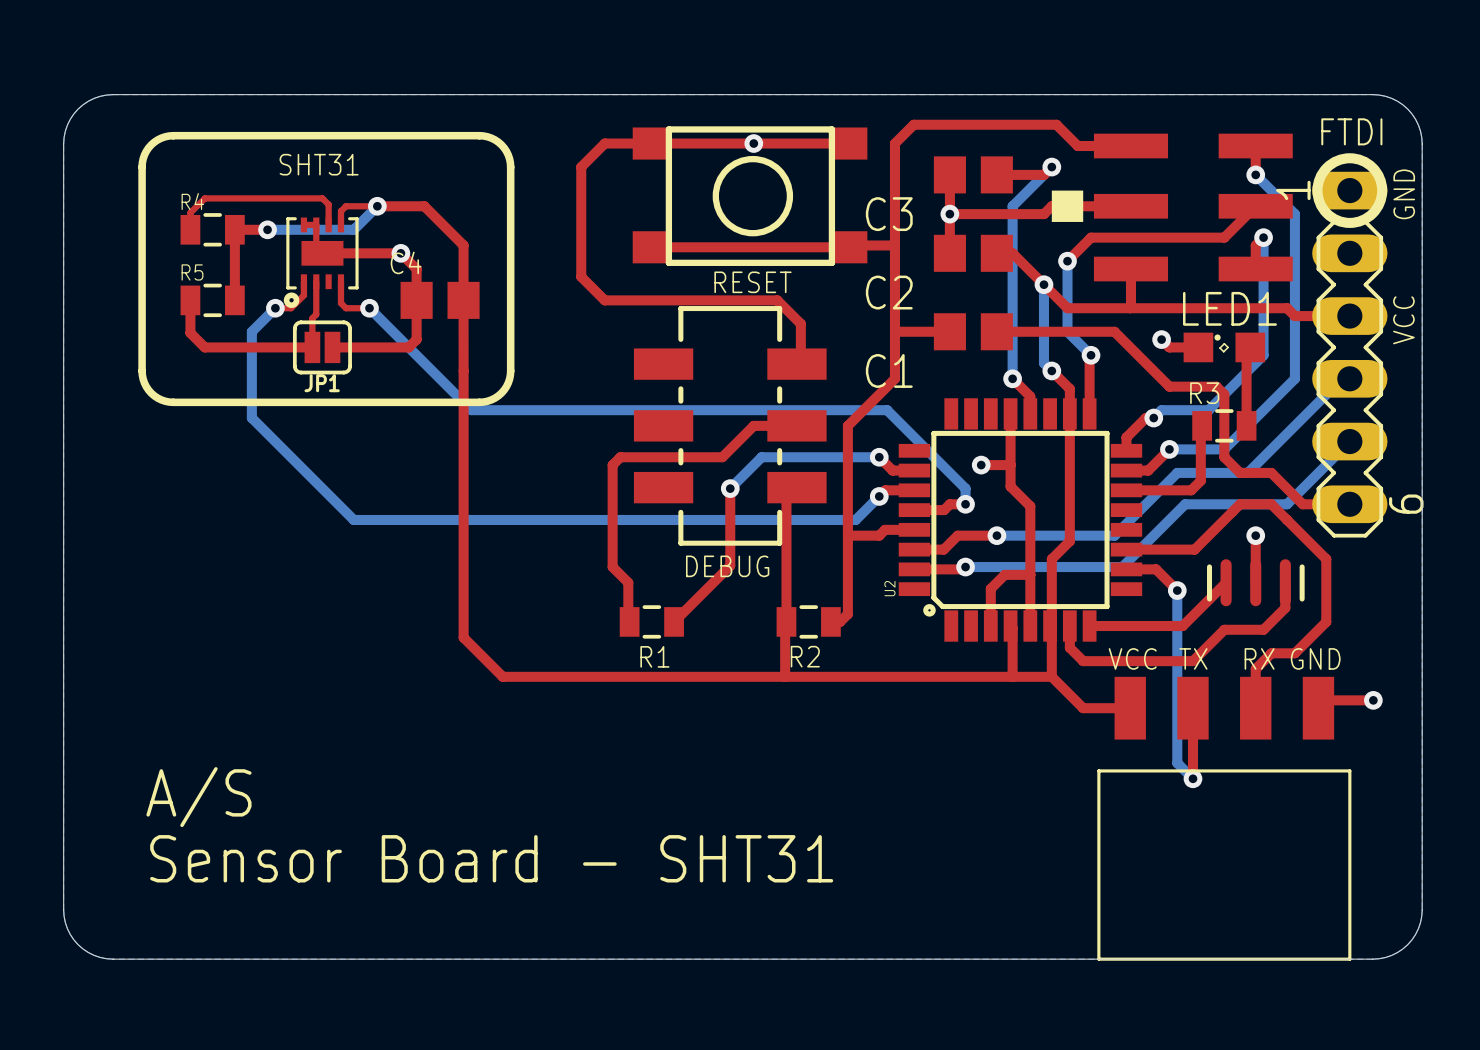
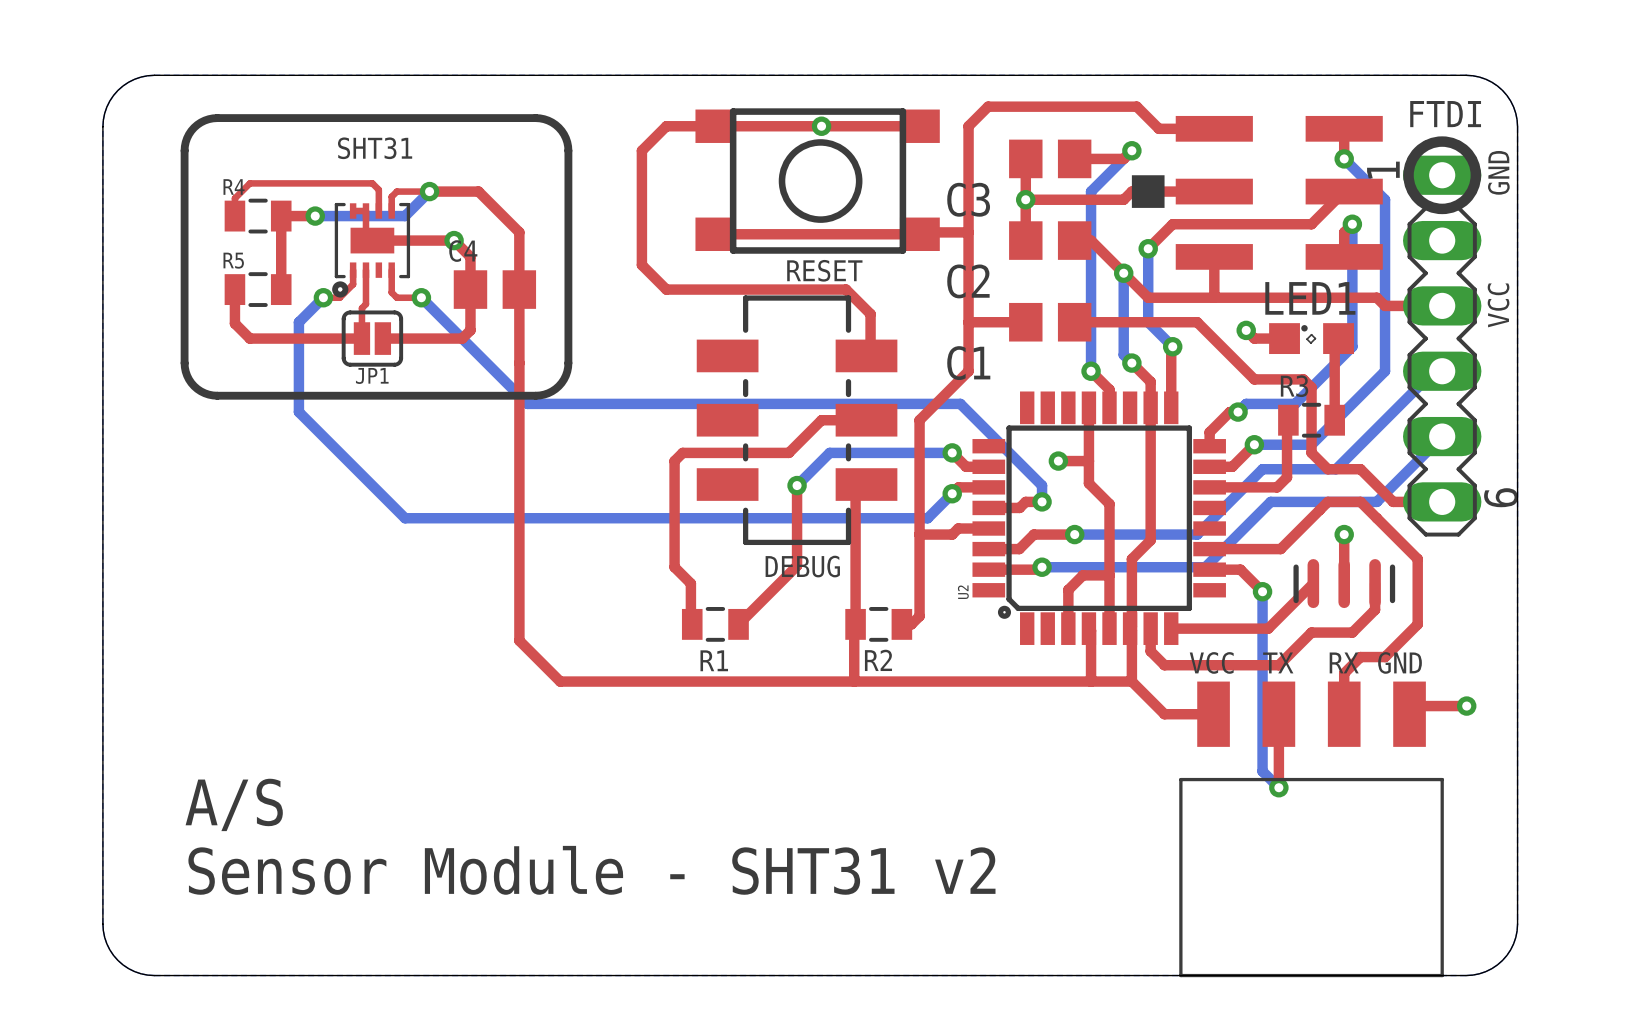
text: Sensor Board - SHT31 (491, 858) -> Sensor Module - SHT31 v2 (591, 870)

